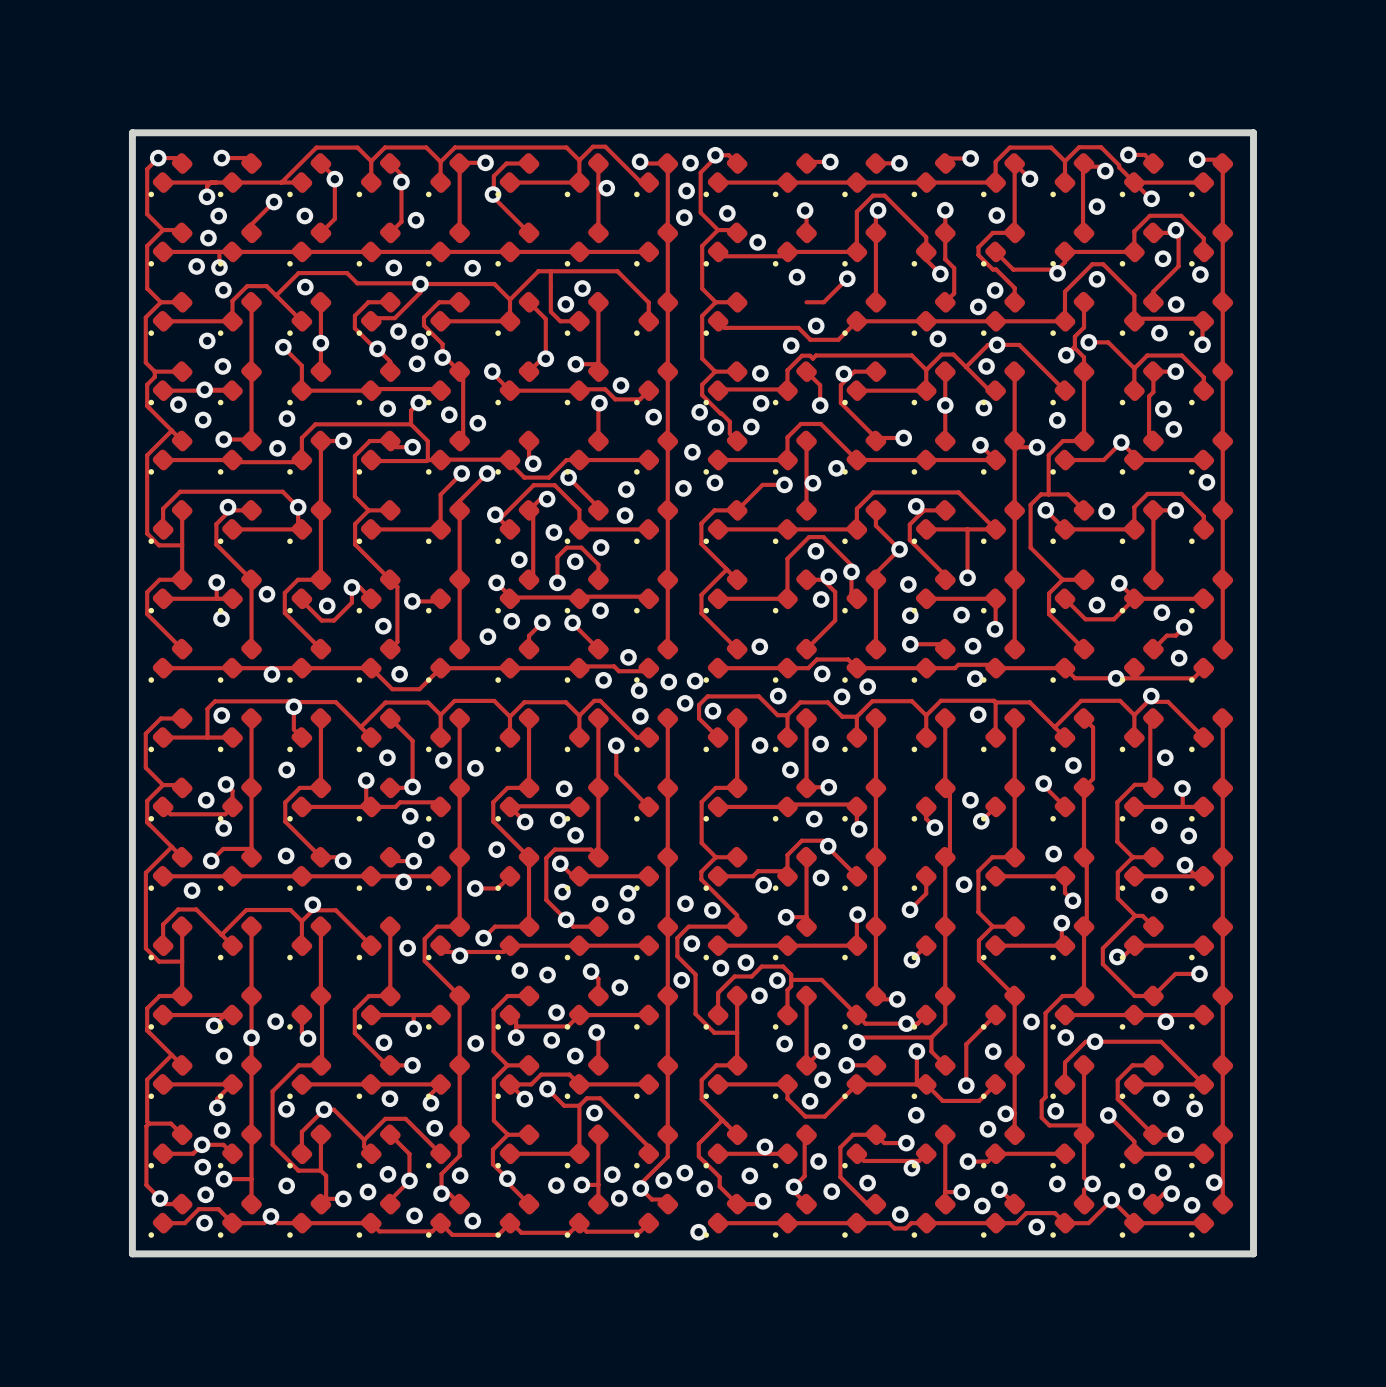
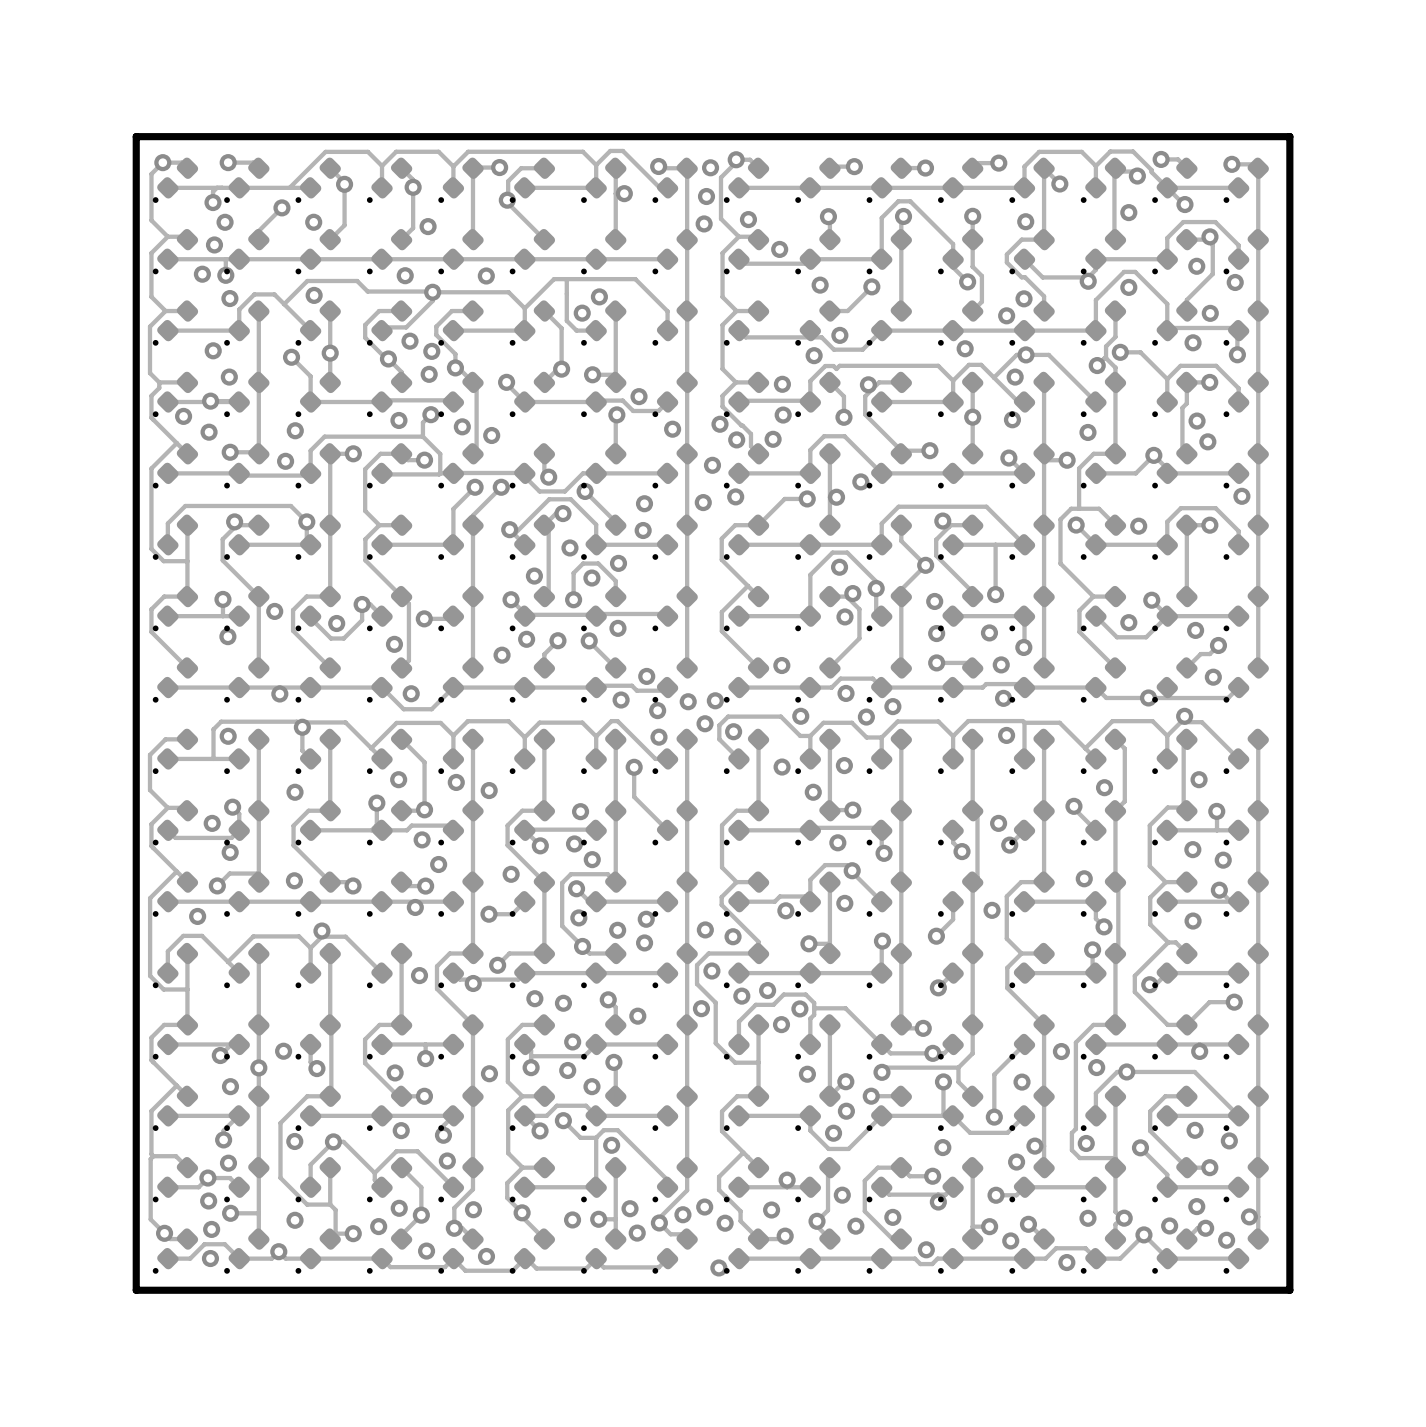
part: none -> (817, 323)

